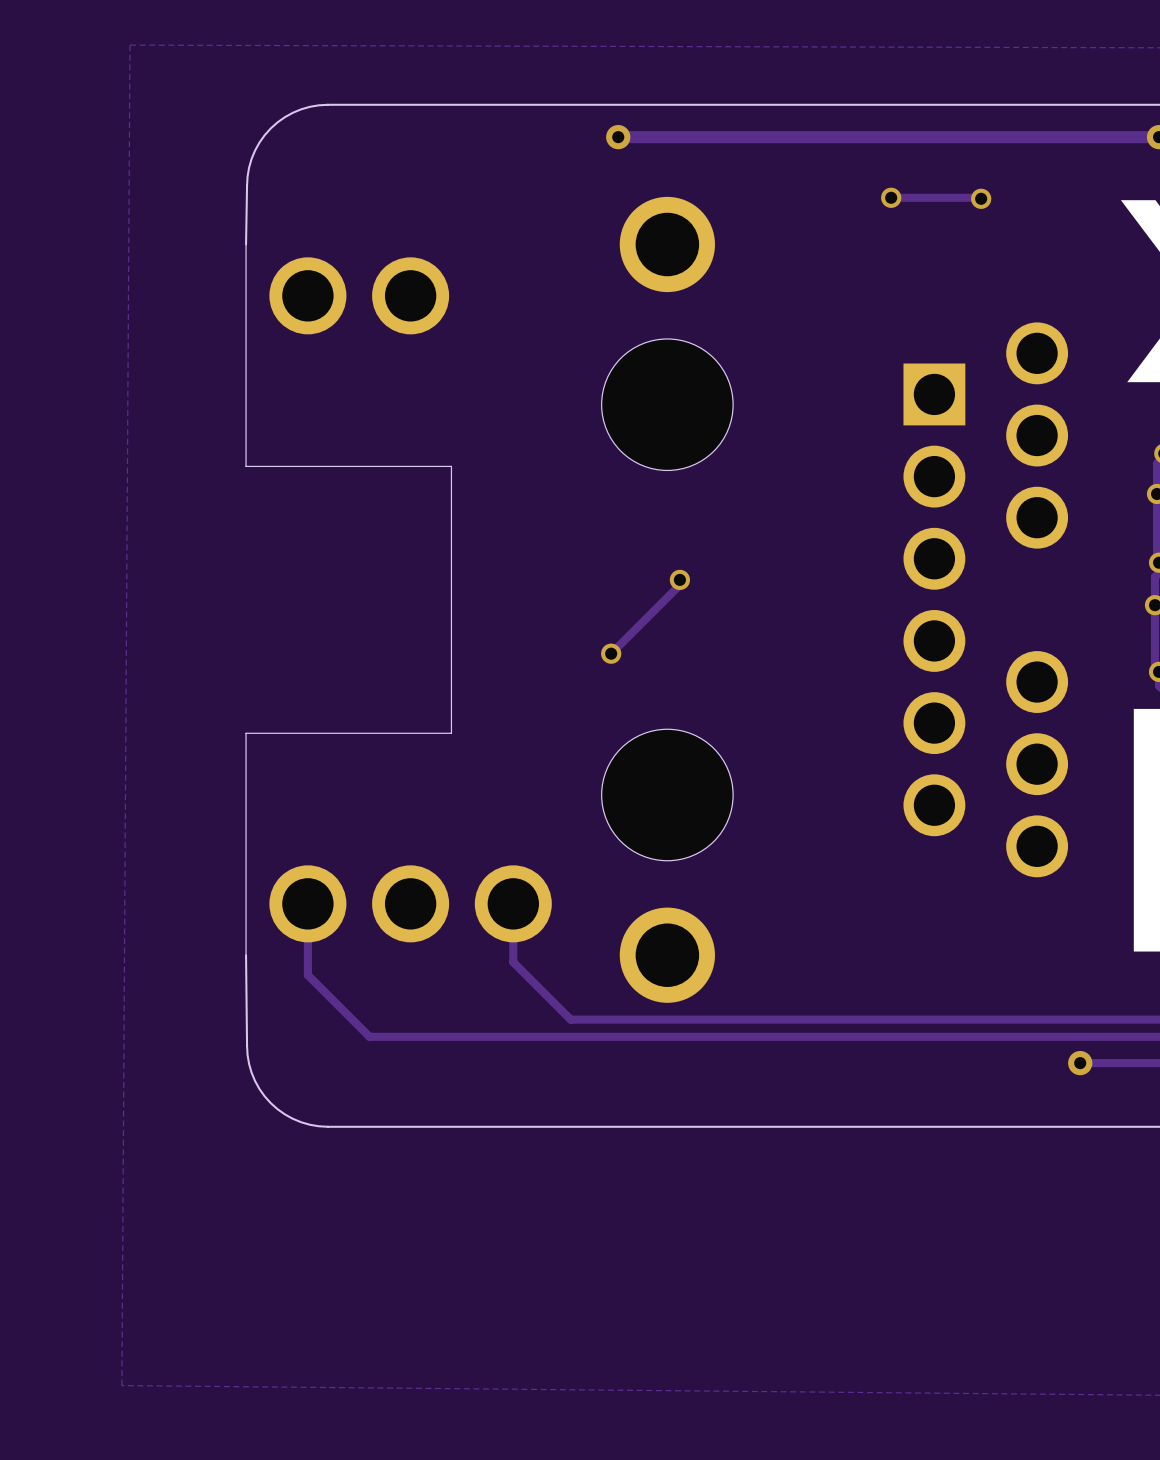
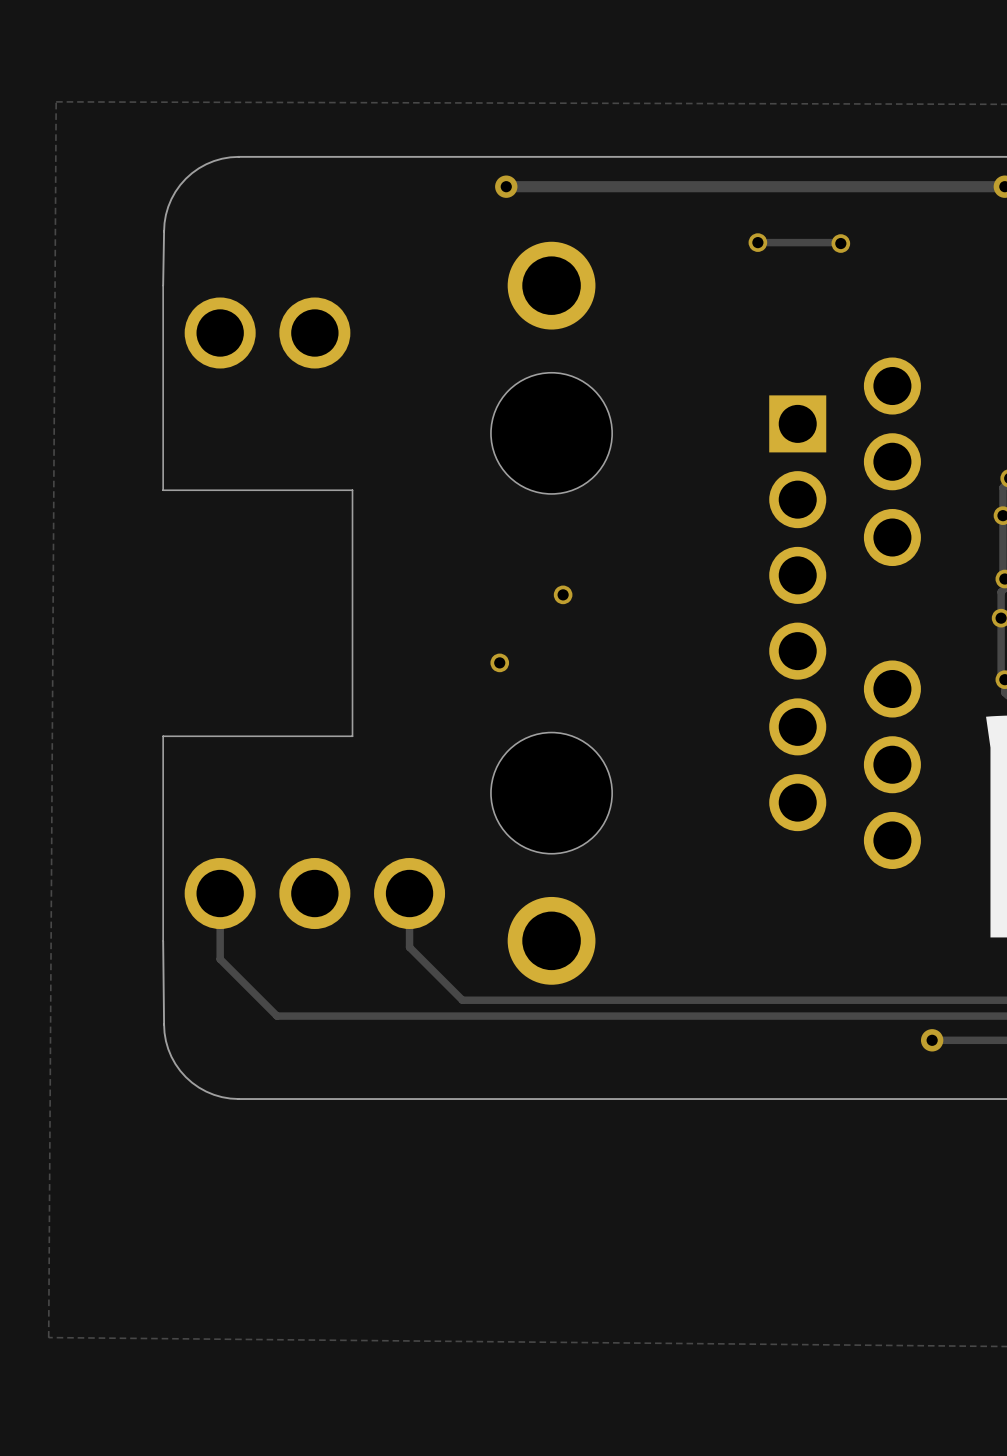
track: (679, 584) (611, 653) -> none

